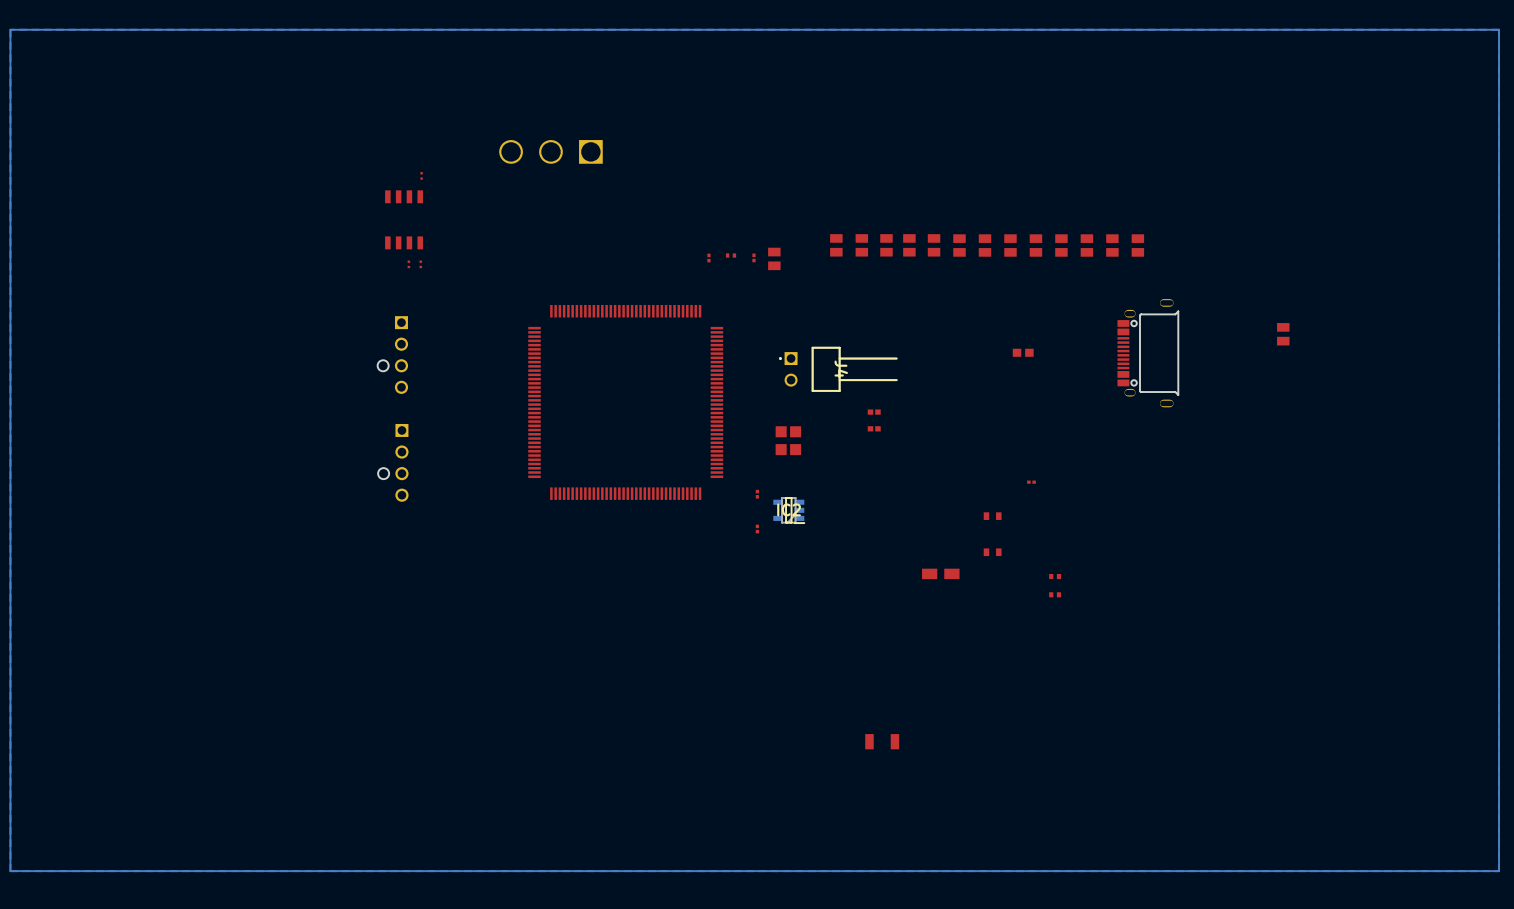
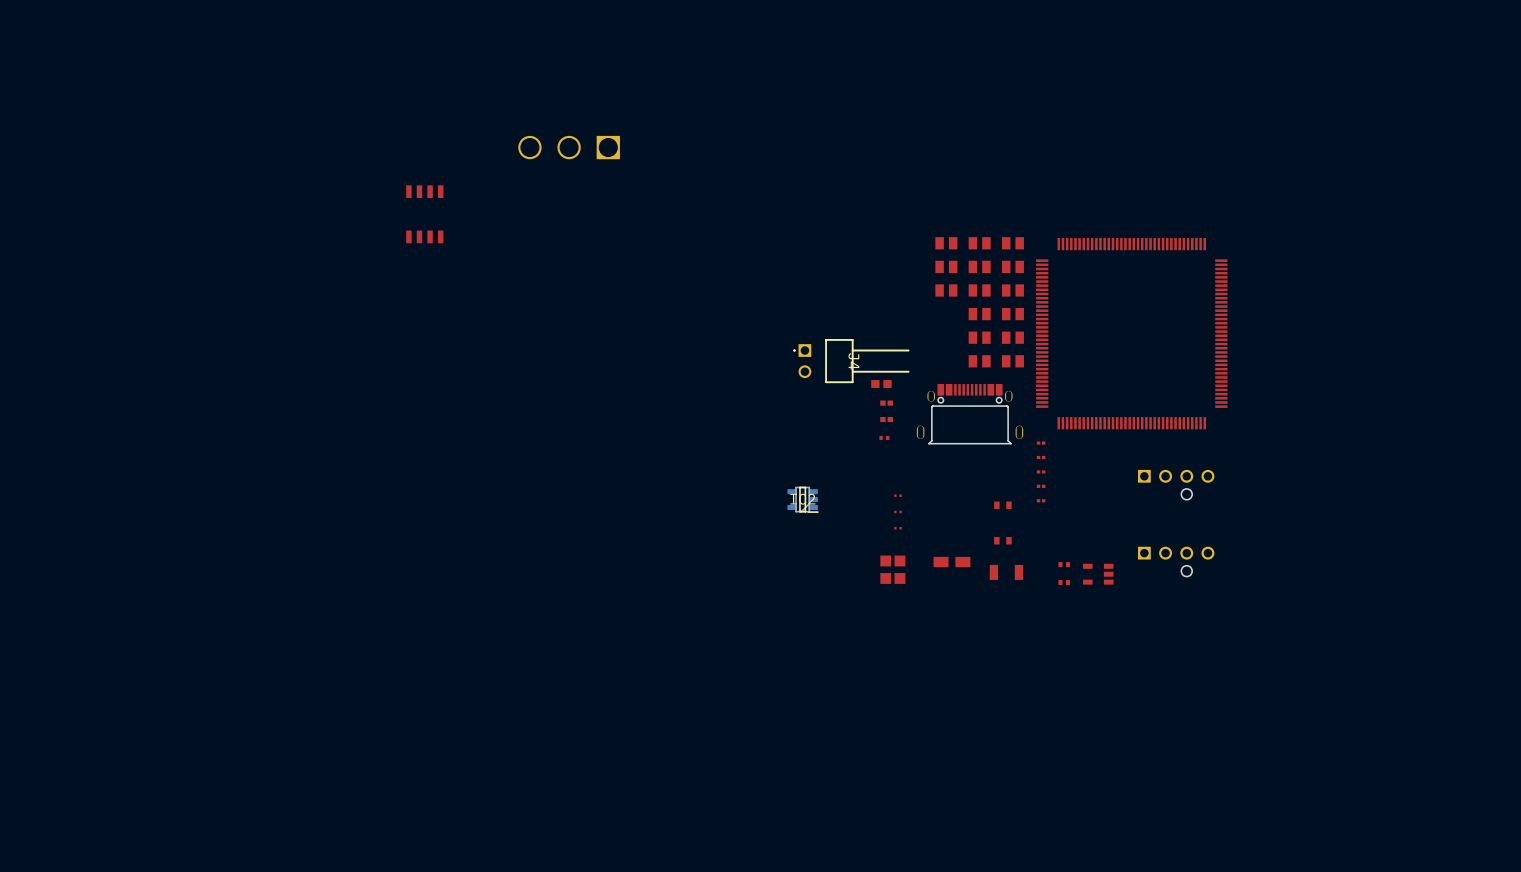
bottom track: (1499, 29) (10, 29) (10, 871) (1499, 871) (1499, 29) -> none
part: (421, 175) -> none
part: (836, 245) -> none
part: (861, 245) -> none
part: (886, 245) -> none
part: (909, 245) -> none
part rotation: 0° (934, 245) -> 90° clockwise (946, 243)
part: (959, 245) -> none
part: (984, 245) -> none
part rotation: 0° (1010, 245) -> 90° clockwise (1012, 243)
part: (1035, 245) -> none
part: (1061, 245) -> none
part: (1086, 245) -> none
part: (1112, 245) -> none
part: (1137, 245) -> none
part: none -> (979, 243)
part: (731, 255) -> none
part: (753, 257) -> none
part: (708, 258) -> none
part: (774, 258) -> none
part: (408, 264) -> none
part: (420, 264) -> none
part: none -> (946, 266)
part: none -> (979, 266)
part: none -> (1012, 266)
part: none -> (946, 290)
part: none -> (979, 290)
part: none -> (1012, 290)
part: none -> (979, 314)
part: none -> (1012, 314)
part: (1283, 334) -> none
part: none -> (1131, 333)
part: none -> (979, 337)
part: none -> (1012, 337)
part position: (1023, 352) -> (881, 384)
part rotation: 0° (1147, 353) -> 90° clockwise (969, 413)
part position: (1147, 353) -> (969, 413)
part: (392, 355) -> none
part: none -> (979, 361)
part: none -> (1012, 361)
part: (625, 402) -> none
part position: (788, 440) -> (892, 569)
part: none -> (884, 437)
part: none -> (1041, 443)
part: (393, 462) -> none
part: none -> (1041, 457)
part: (757, 494) -> none
part: none -> (1176, 484)
part: none -> (1041, 486)
part: none -> (898, 495)
part: none -> (1041, 500)
part: none -> (898, 511)
part: (757, 529) -> none
part: none -> (898, 528)
part: none -> (1176, 561)
part: none -> (1098, 574)
part position: (882, 741) -> (1006, 572)

